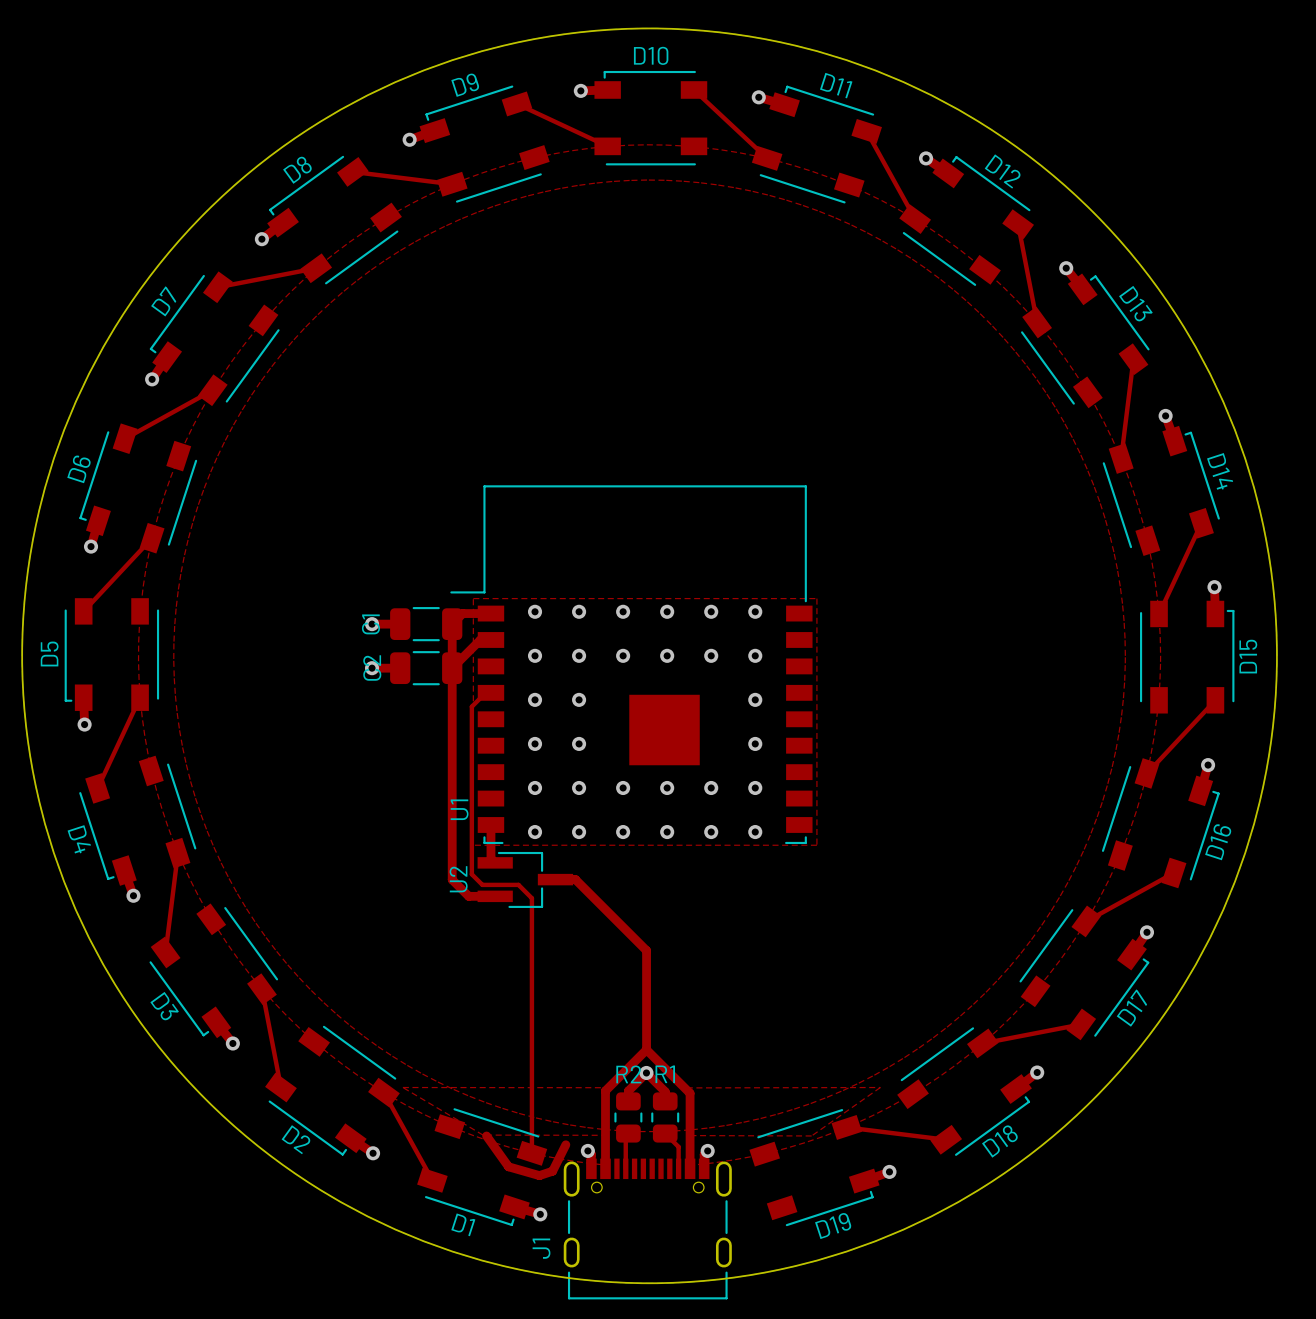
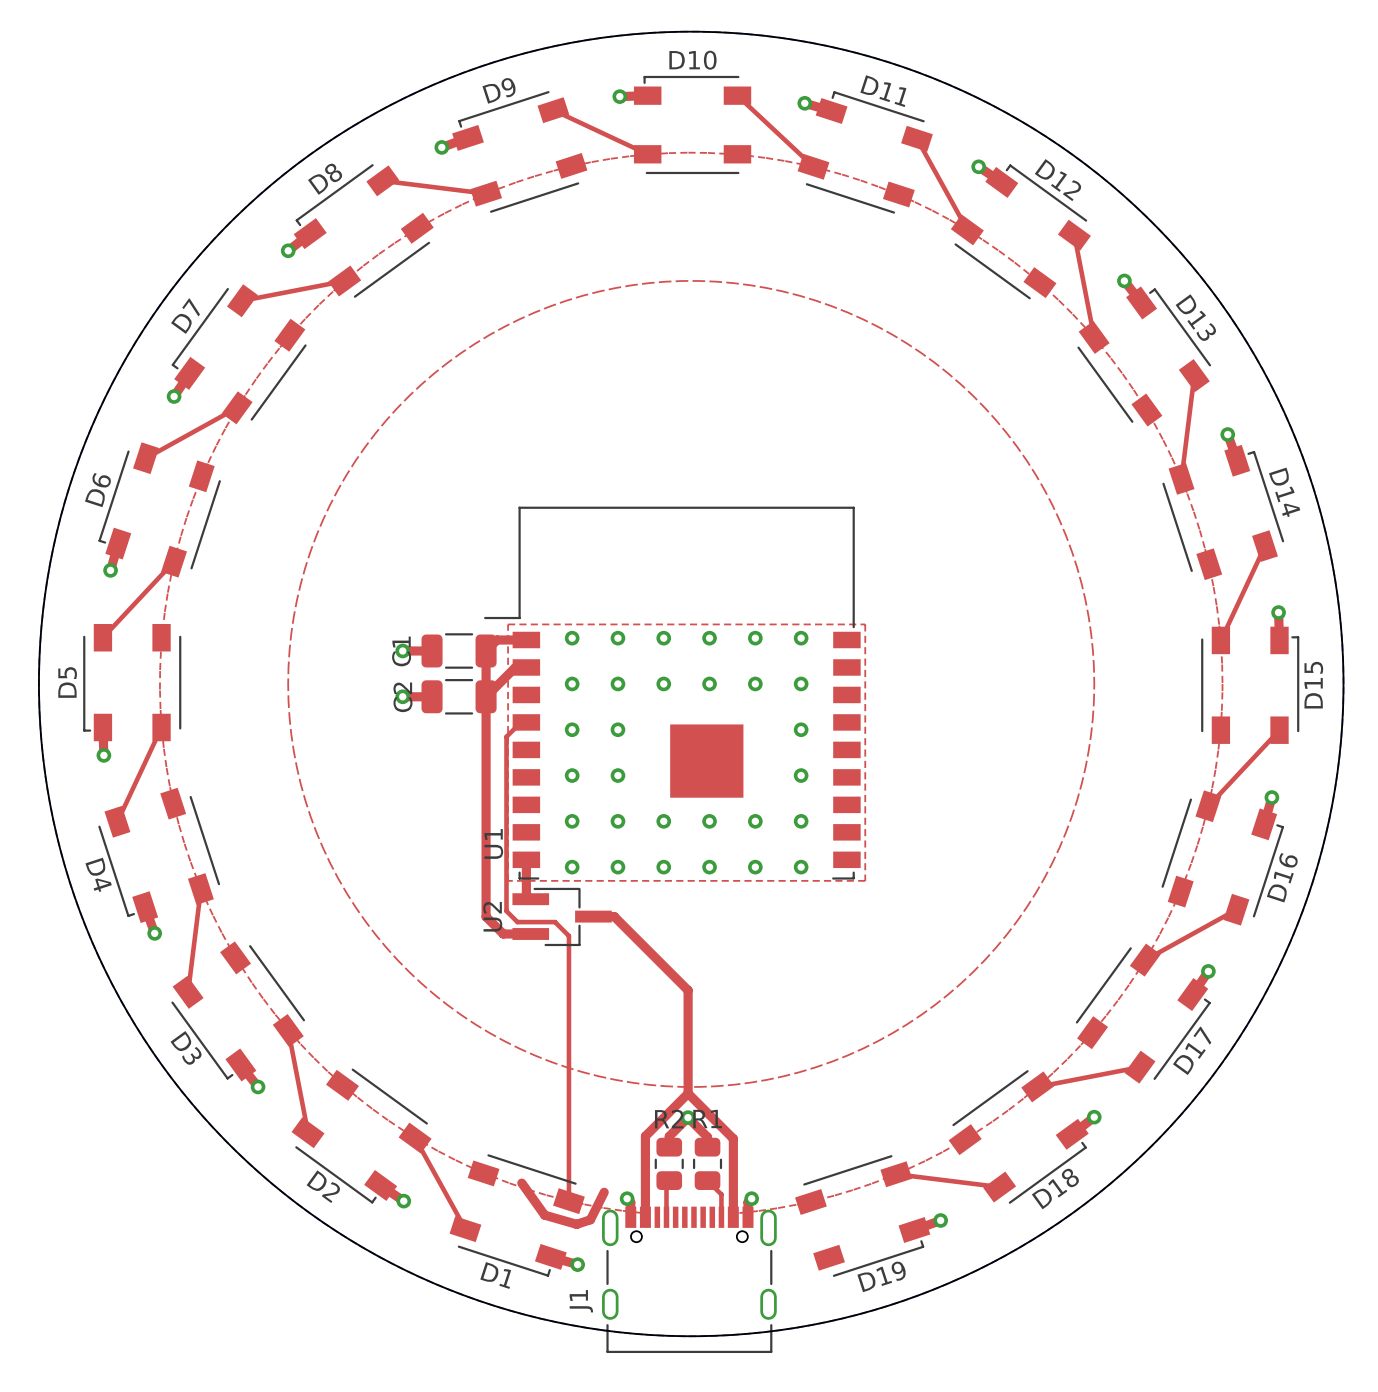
top zone outline: (647, 180) (699, 182) (750, 190) (784, 199) (833, 217) (880, 240) (925, 268) (966, 300) (991, 324) (1025, 364) (1045, 392) (1064, 422) (1087, 469) (1105, 518) (1117, 569) (1124, 621) (1125, 655) (1123, 698) (1115, 749) (1107, 783) (1091, 833) (1068, 880) (1041, 925) (1020, 953) (985, 992) (947, 1027) (919, 1047) (889, 1066) (843, 1090) (794, 1109) (743, 1122) (709, 1127) (657, 1131) (622, 1130) (570, 1124) (536, 1117) (486, 1102) (437, 1082) (407, 1065) (363, 1036) (323, 1002) (287, 964) (256, 923) (229, 878) (213, 847) (195, 798) (182, 747) (175, 695) (173, 660) (176, 608) (184, 556) (192, 523) (209, 473) (224, 442) (250, 396) (281, 354) (316, 315) (355, 281) (398, 251) (429, 234) (476, 212) (509, 201) (560, 188) (594, 183) (647, 180) -> (682, 280) (615, 288) (566, 300) (535, 312) (504, 326) (461, 352) (421, 384) (397, 408) (375, 433) (346, 475) (316, 535) (300, 583) (293, 616) (289, 650) (288, 700) (296, 767) (305, 800) (323, 847) (355, 907) (375, 934) (409, 971) (447, 1005) (475, 1024) (504, 1041) (550, 1061) (615, 1079) (649, 1084) (699, 1086) (766, 1079) (815, 1067) (847, 1055) (892, 1033) (921, 1014) (960, 983) (985, 959) (1007, 934) (1036, 892) (1066, 832) (1081, 784) (1088, 751) (1092, 717) (1093, 667) (1085, 600) (1077, 567) (1059, 520) (1026, 460) (1007, 433) (973, 395) (934, 362) (907, 343) (877, 326) (831, 306) (766, 288) (733, 283) (682, 280)
top zone outline: (402, 1087) (483, 1135) (607, 1135) (607, 1089) (608, 1087) (402, 1087) -> none
top zone outline: (880, 1087) (811, 1135) (688, 1135) (686, 1087) (880, 1087) -> none

